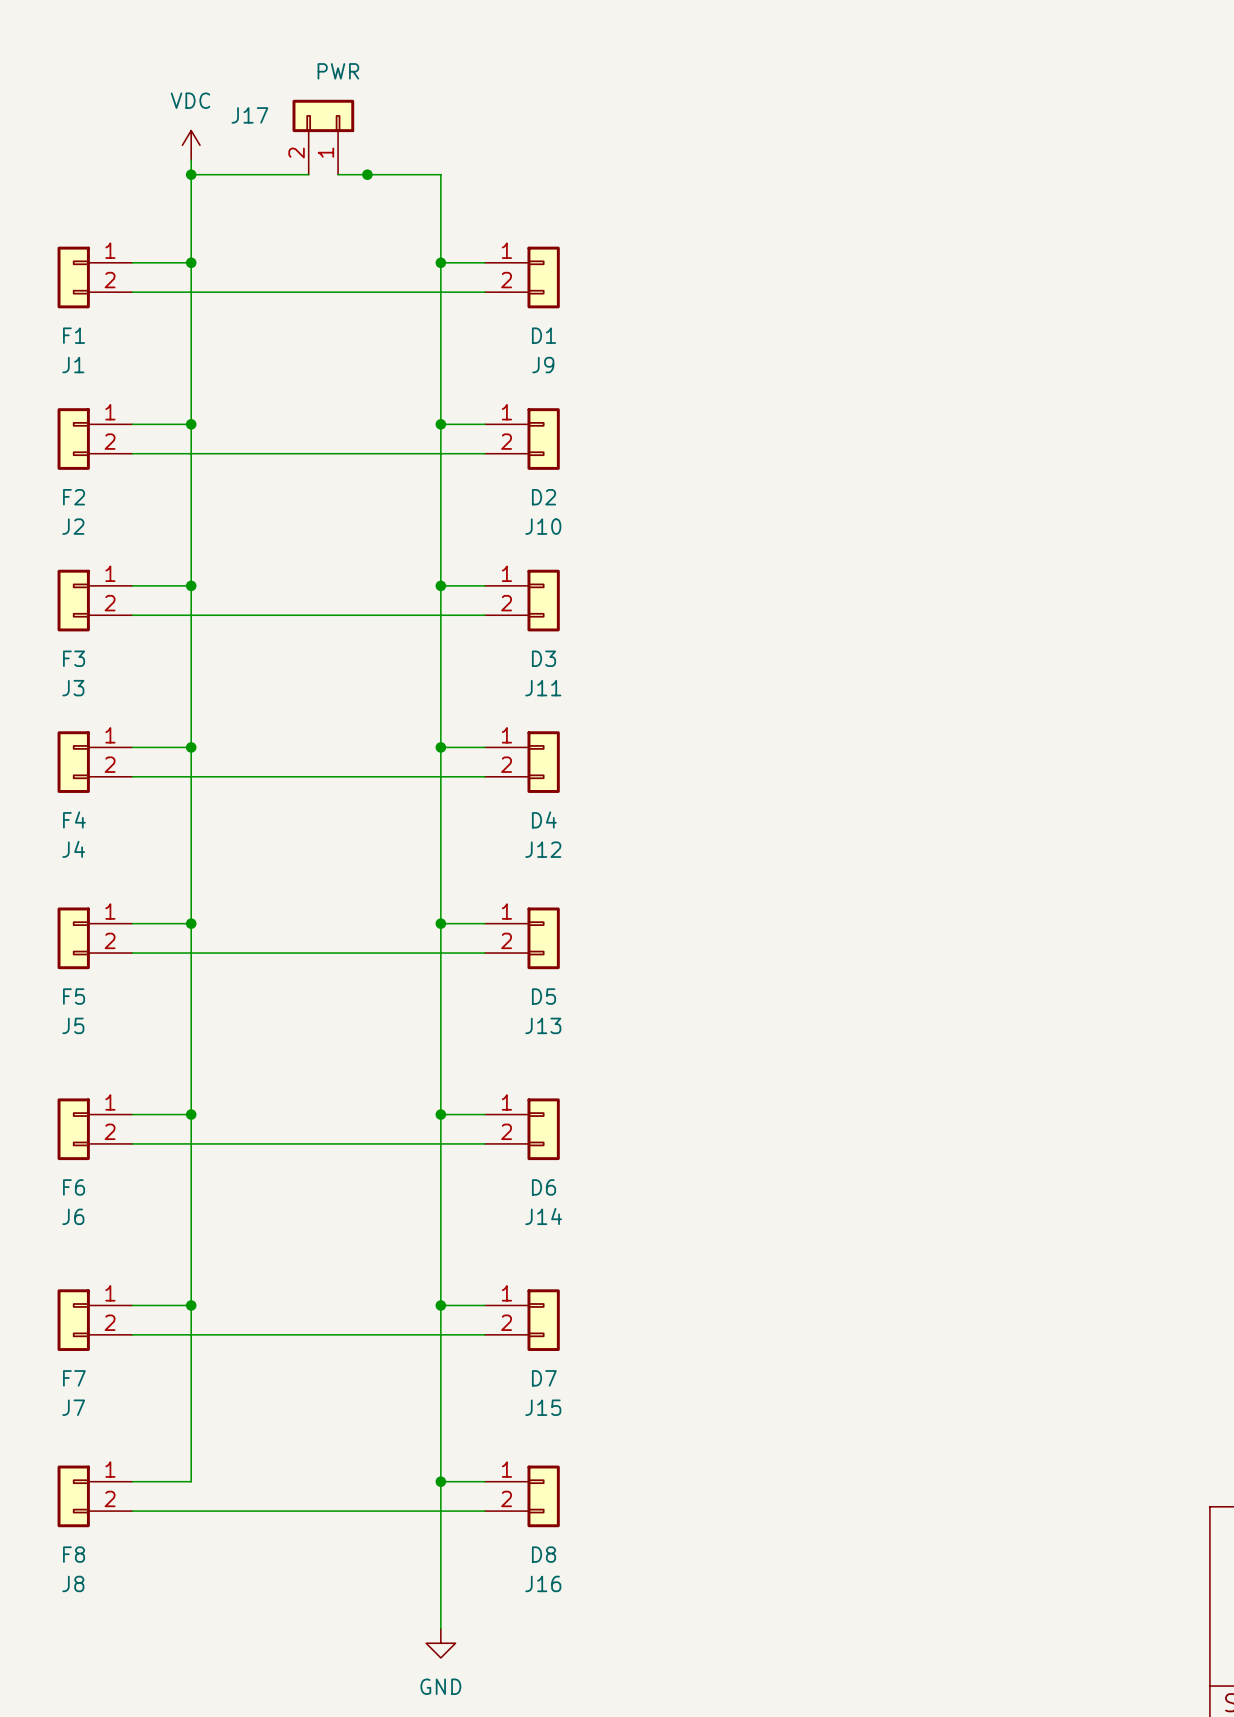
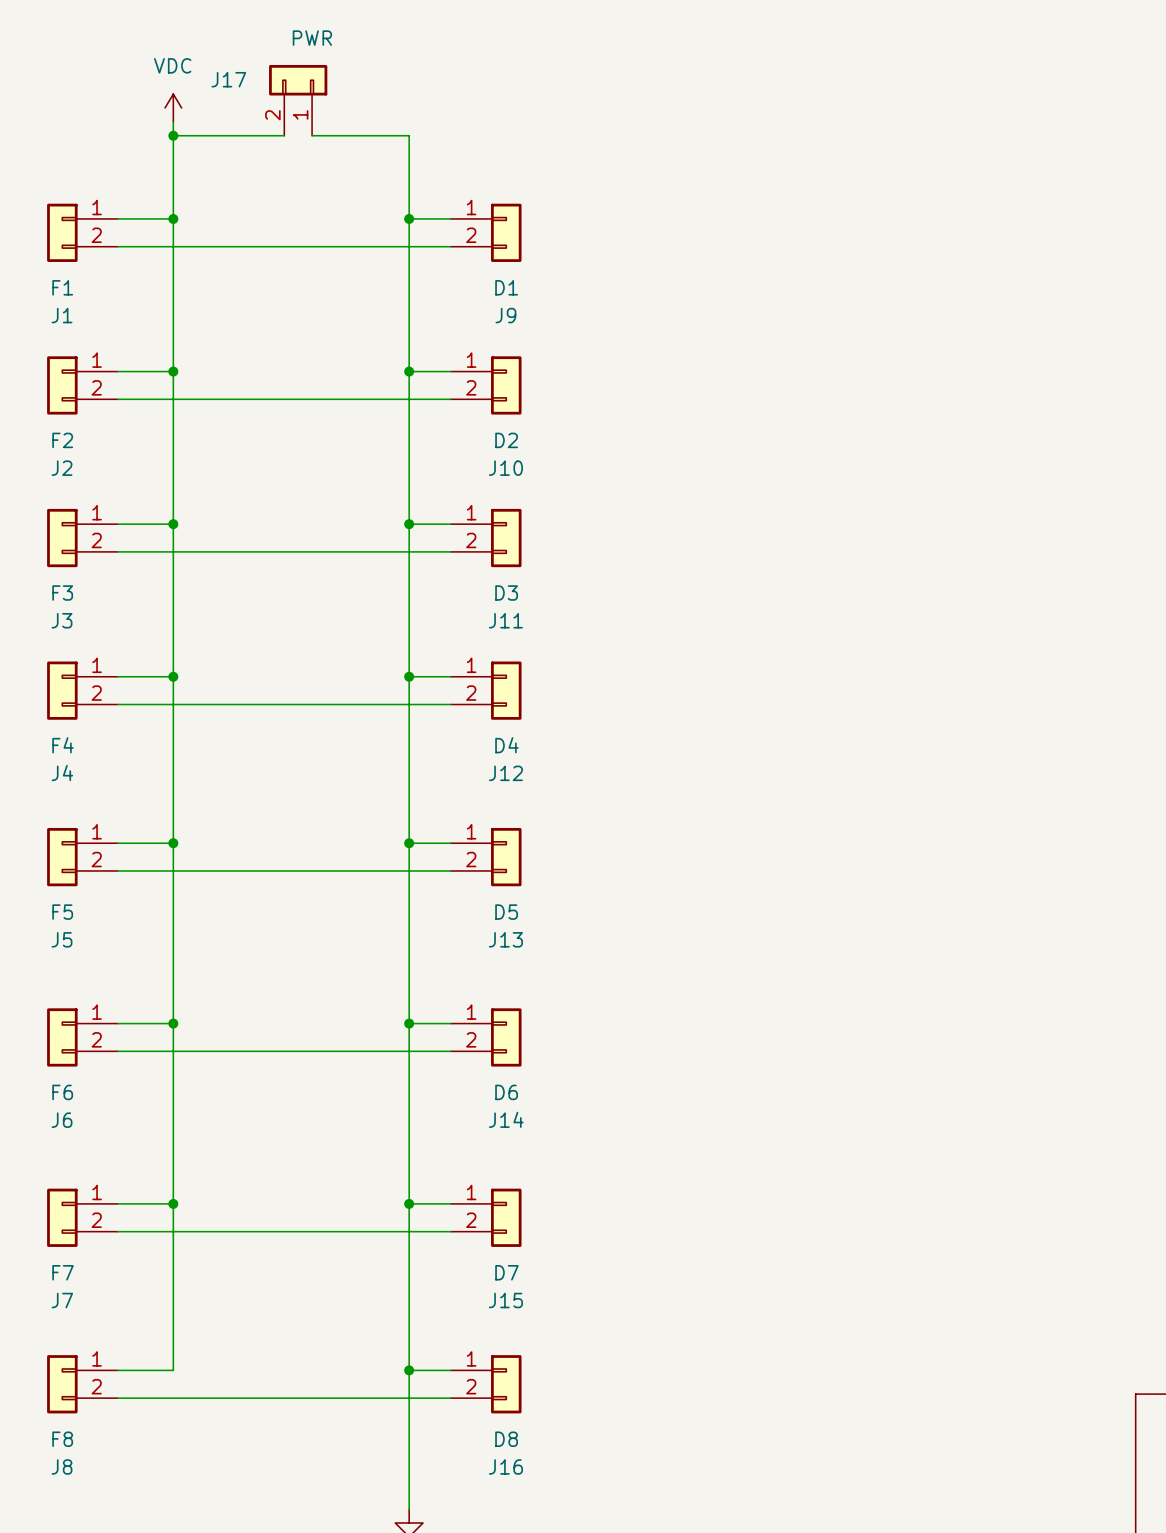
junction: (367, 174) -> none

